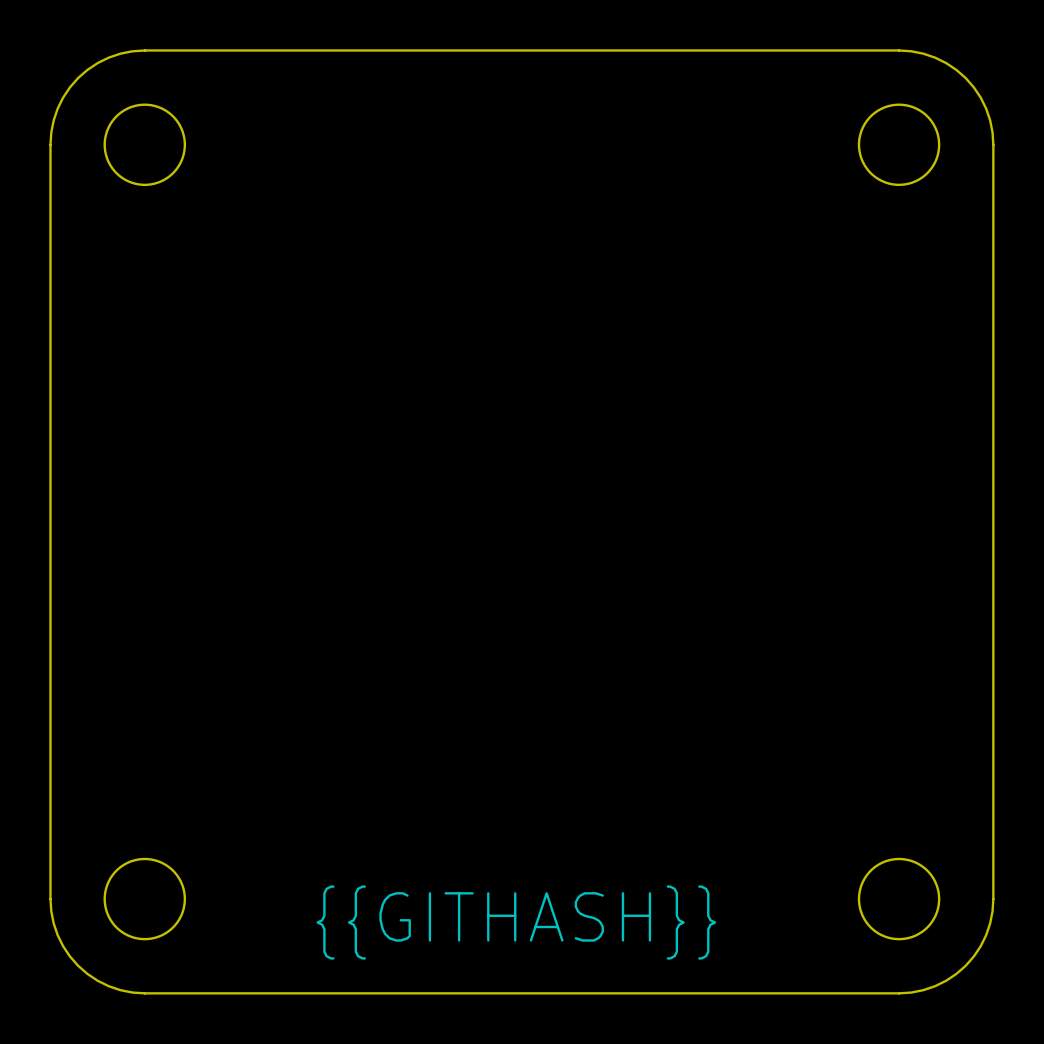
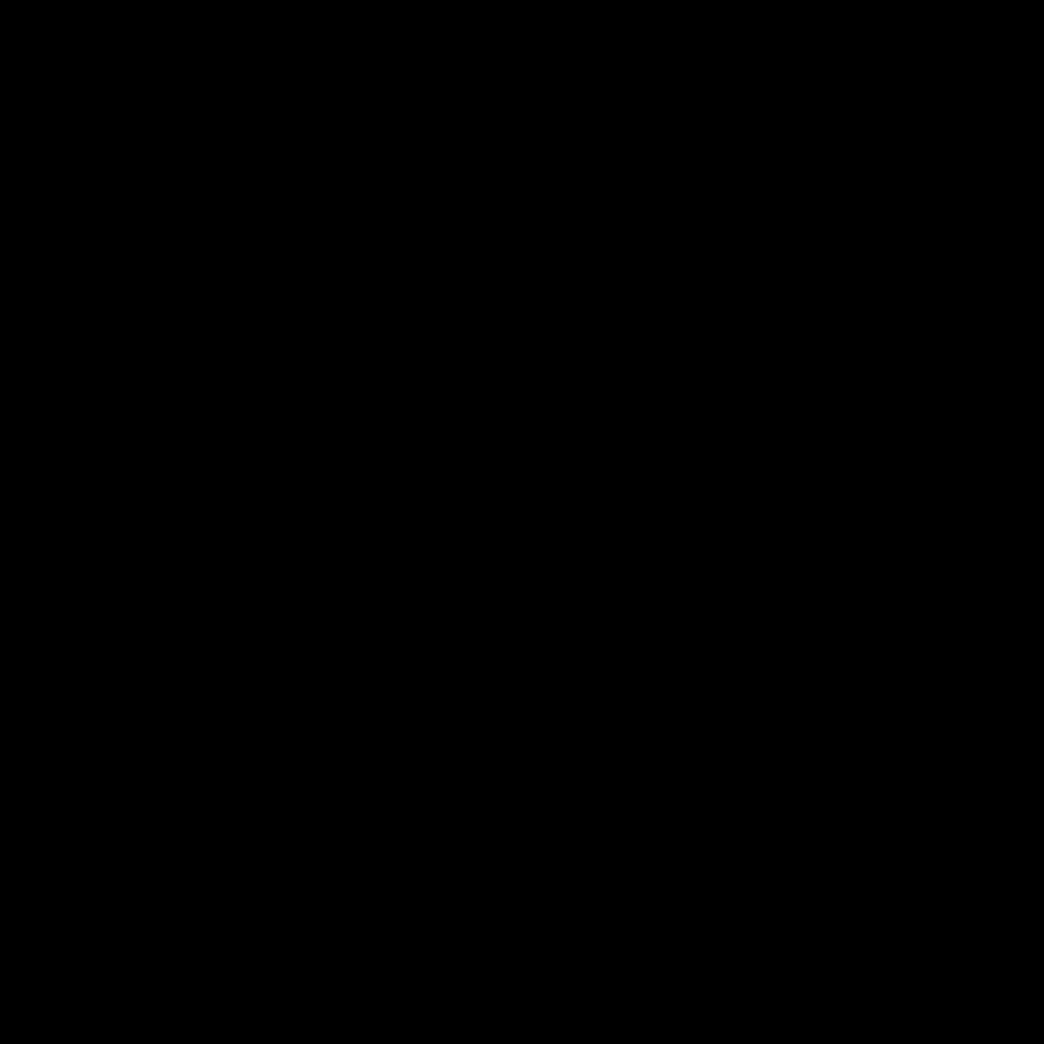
board edge: (144, 50) (899, 50) (923, 53) (935, 57) (956, 69) (965, 78) (973, 87) (986, 108) (990, 120) (993, 144) (993, 899) (992, 911) (986, 935) (973, 956) (965, 965) (956, 973) (935, 986) (923, 990) (899, 993) (144, 993) (132, 992) (108, 986) (87, 973) (78, 965) (63, 946) (57, 935) (51, 911) (50, 899) (51, 132) (57, 108) (63, 97) (78, 78) (87, 69) (108, 57) (120, 53) (144, 50) -> none
round board edge: [103, 103, 187, 187] -> none
round board edge: [857, 103, 941, 187] -> none
round board edge: [103, 857, 187, 941] -> none
round board edge: [857, 857, 941, 941] -> none
text: {{GITHASH}} (516, 922) -> none

